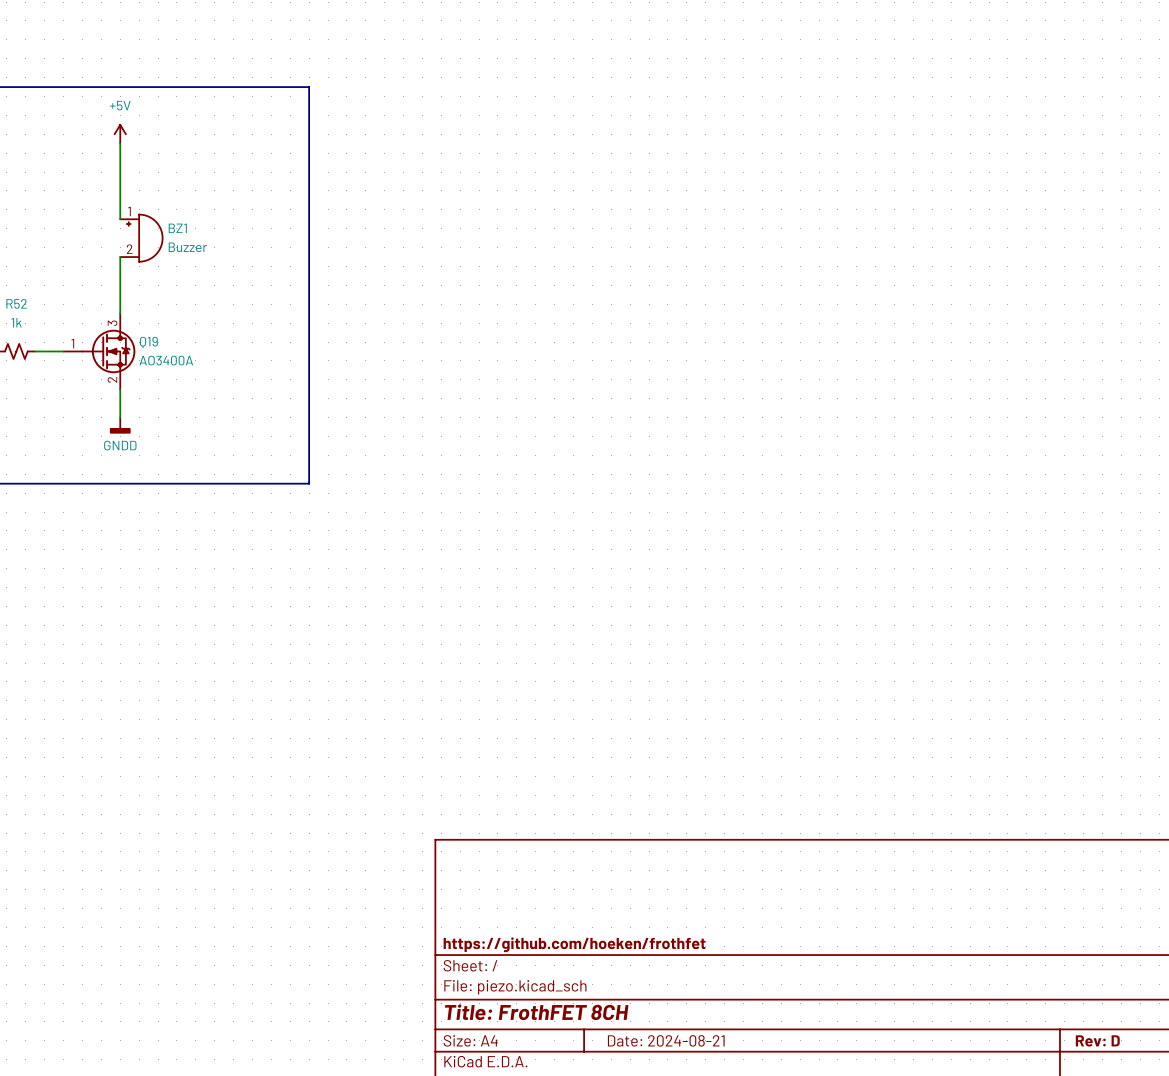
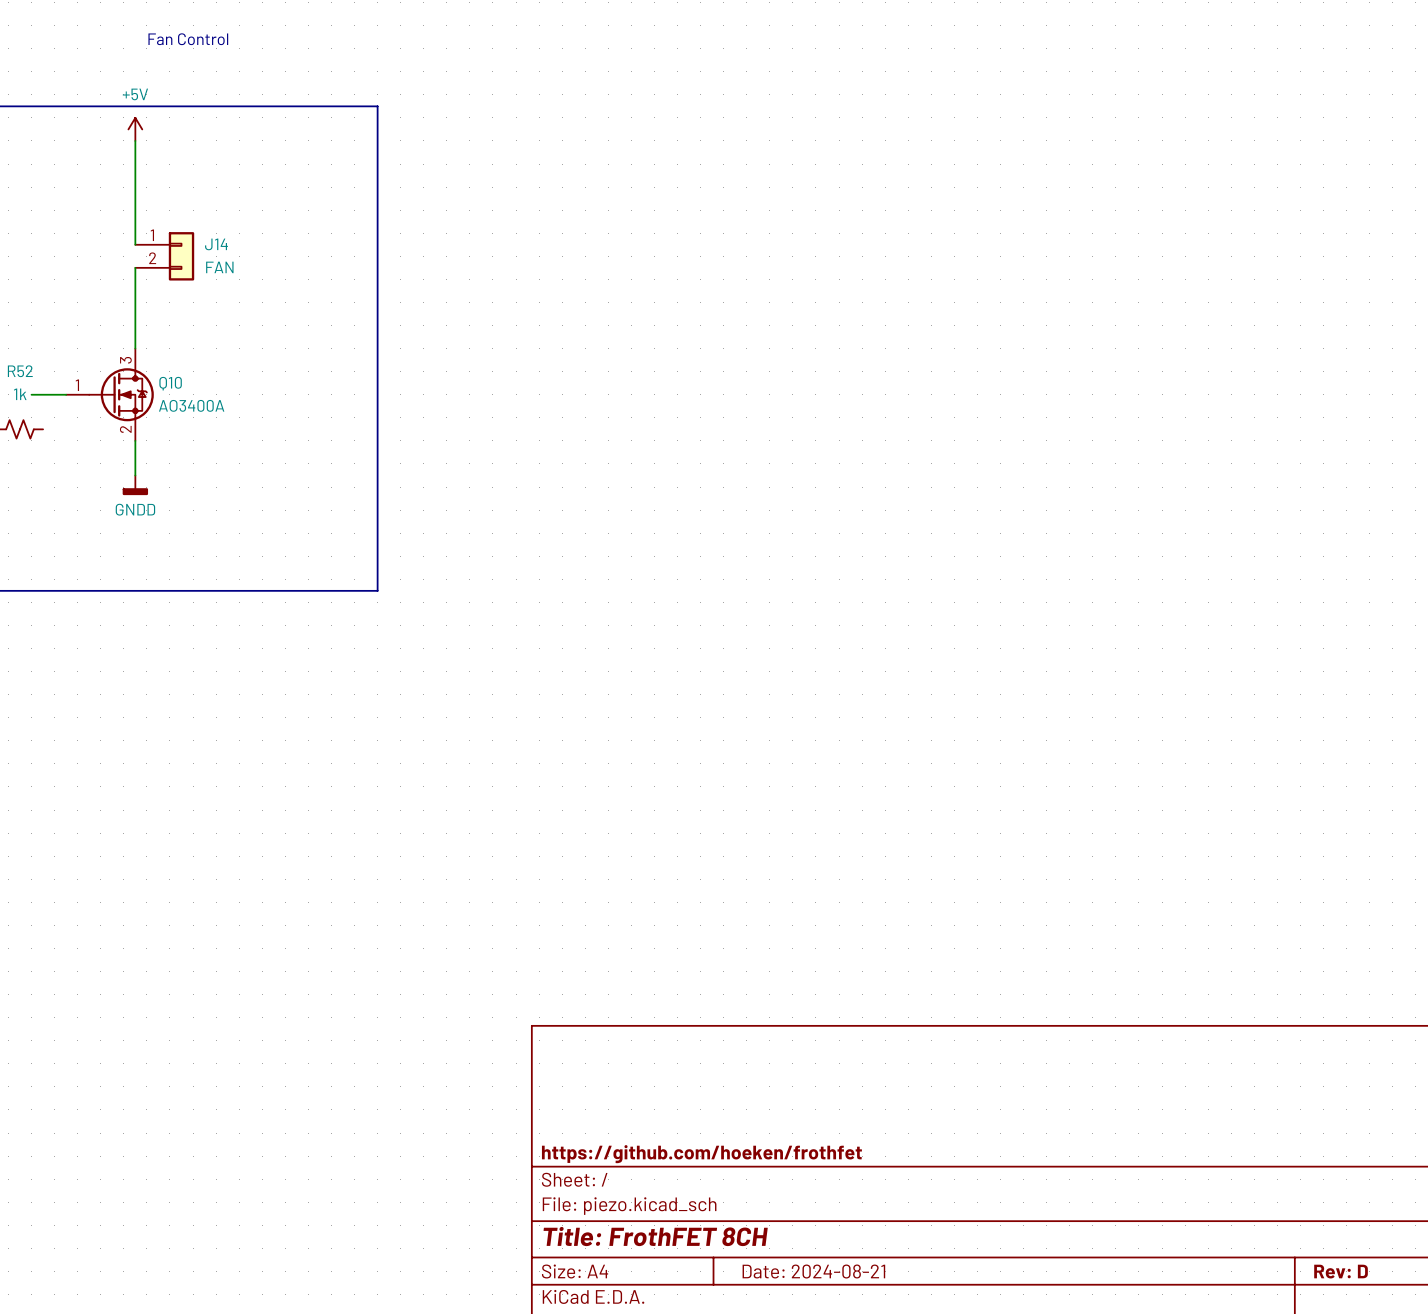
text: none -> Fan Control (188, 39)
wire: none -> (135, 140) (135, 244)
power symbol position: +5V (120, 134) -> +5V (135, 129)
wire: (120, 143) (120, 219) -> none
J14: none -> FAN (164, 256)
wire: none -> (135, 267) (135, 348)
BZ1: Buzzer (141, 238) -> none
wire: (120, 257) (120, 313) -> none
Q10: none -> AO3400A (109, 394)
wire: (35, 351) (63, 351) -> (31, 394) (66, 394)
Q19: AO3400A (99, 351) -> none
wire: (120, 389) (120, 417) -> (135, 440) (135, 475)
power symbol position: GNDD (120, 425) -> GNDD (135, 485)

